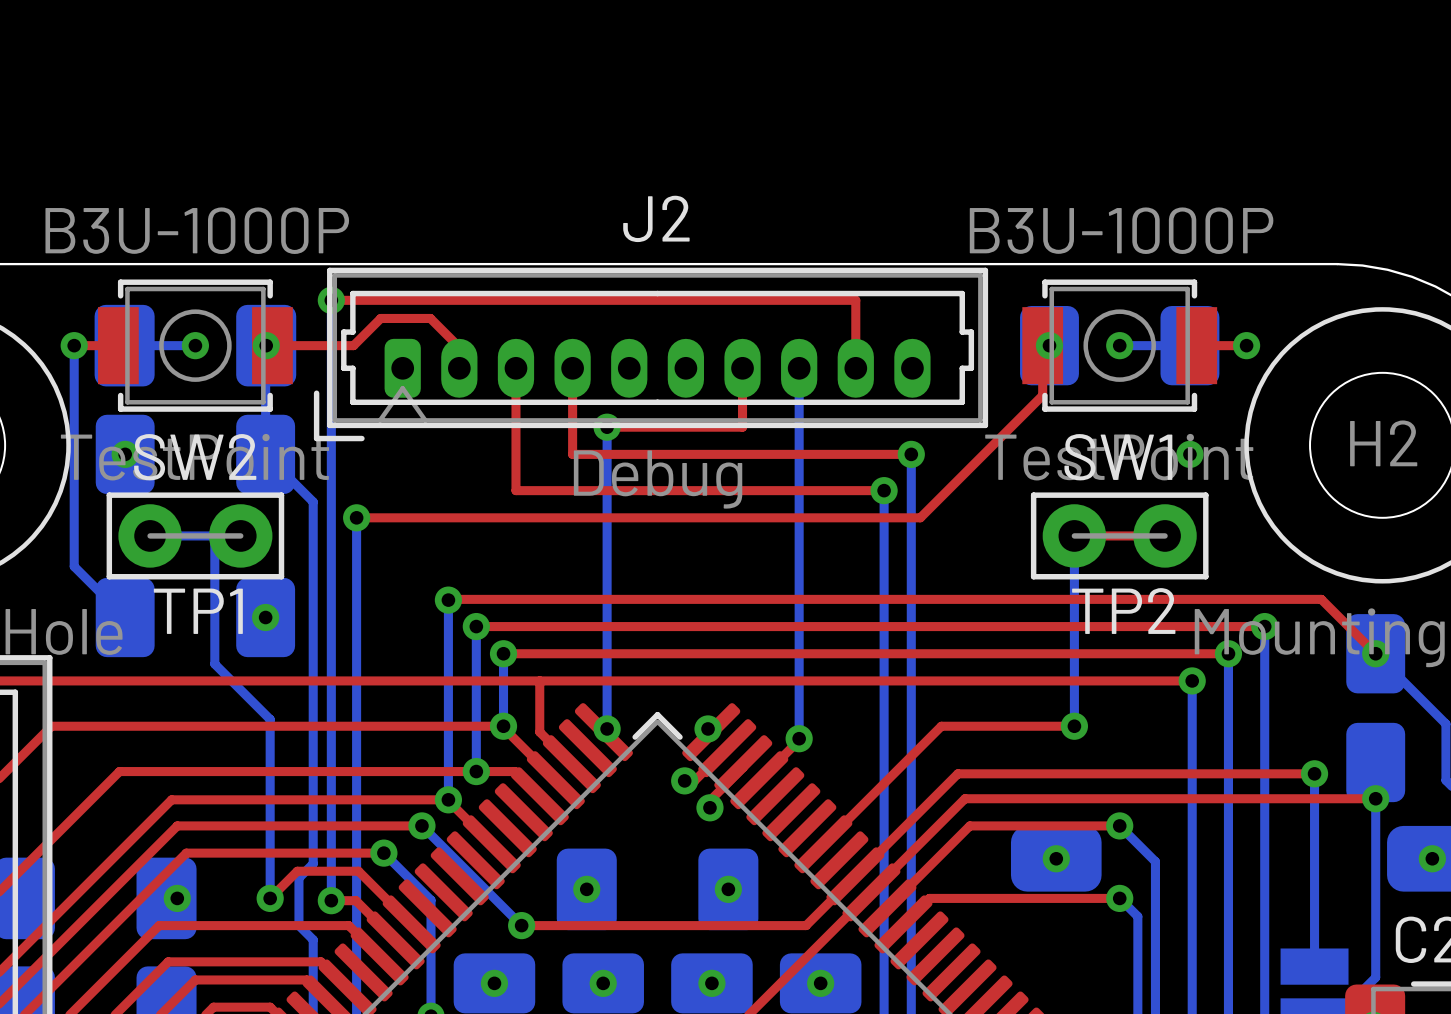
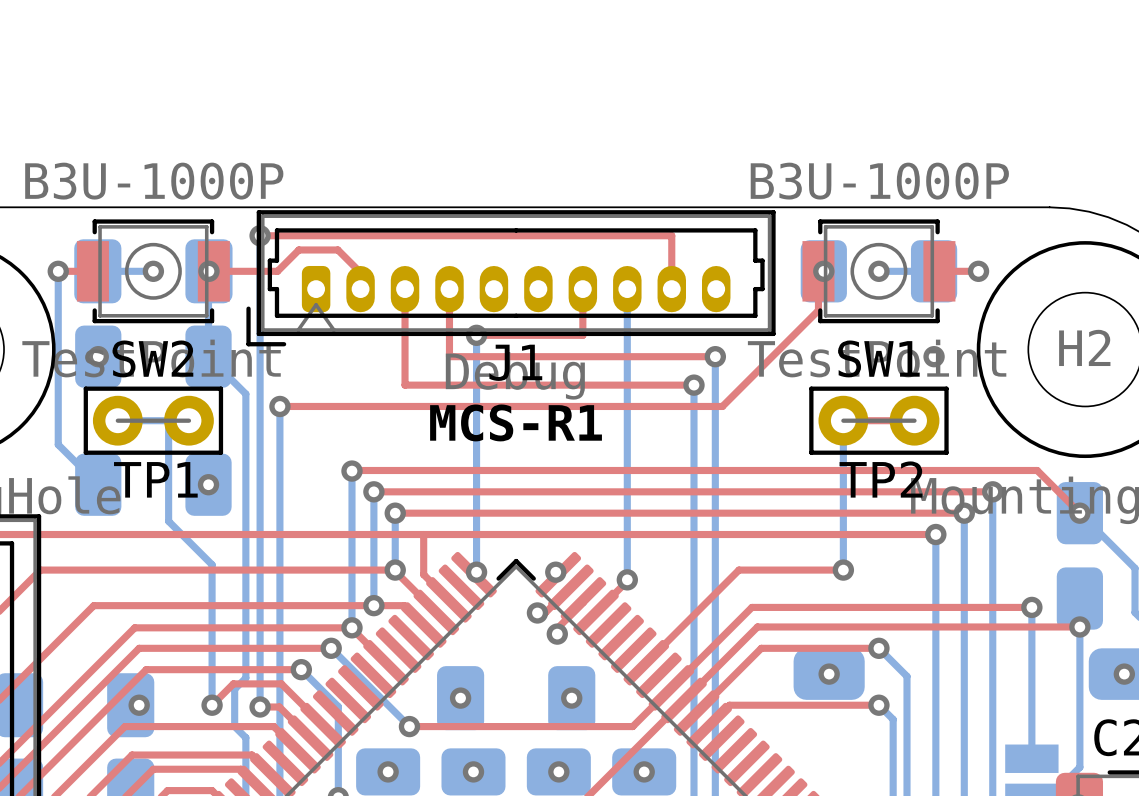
J2 name: J2 (656, 218) -> J1 (515, 362)
text: none -> MCS-R1 (516, 422)

